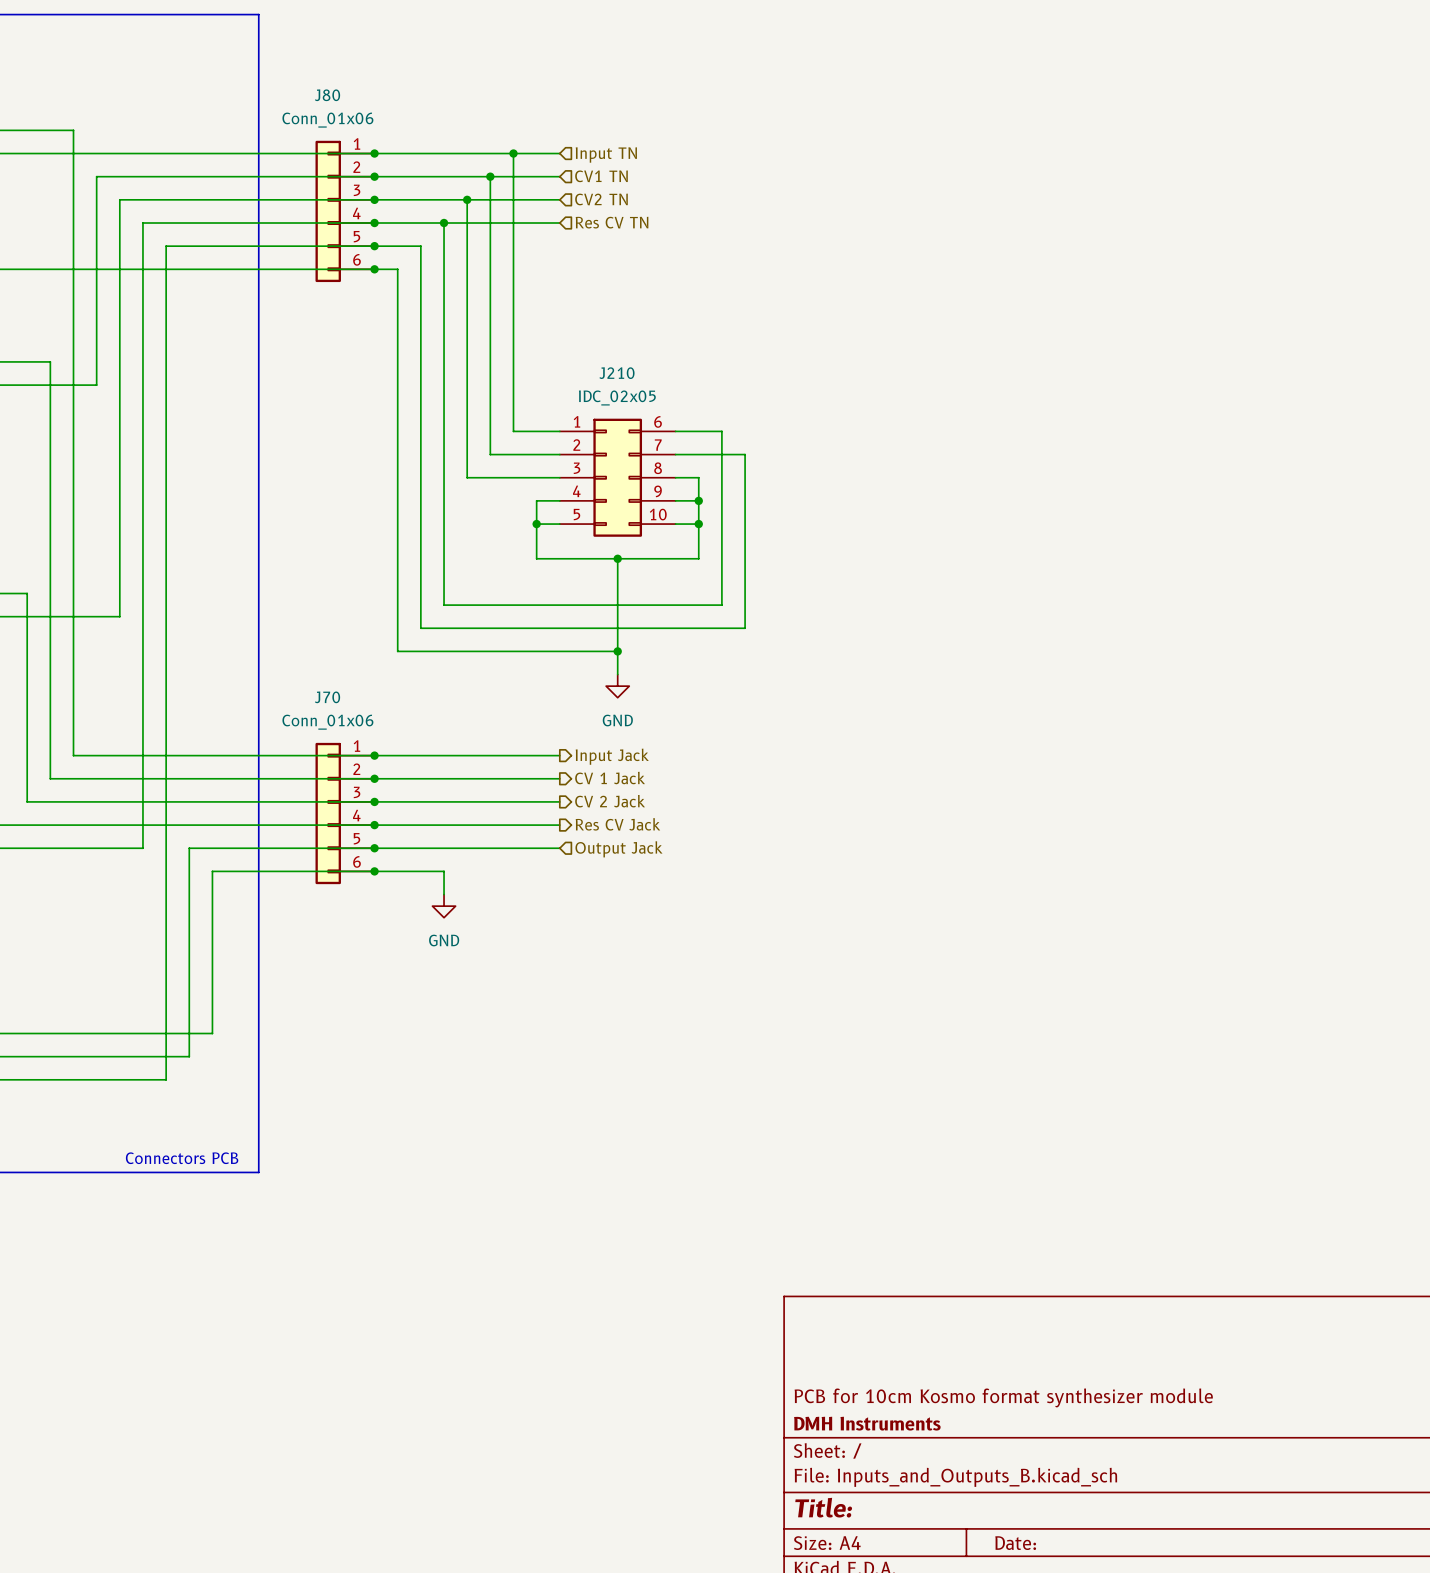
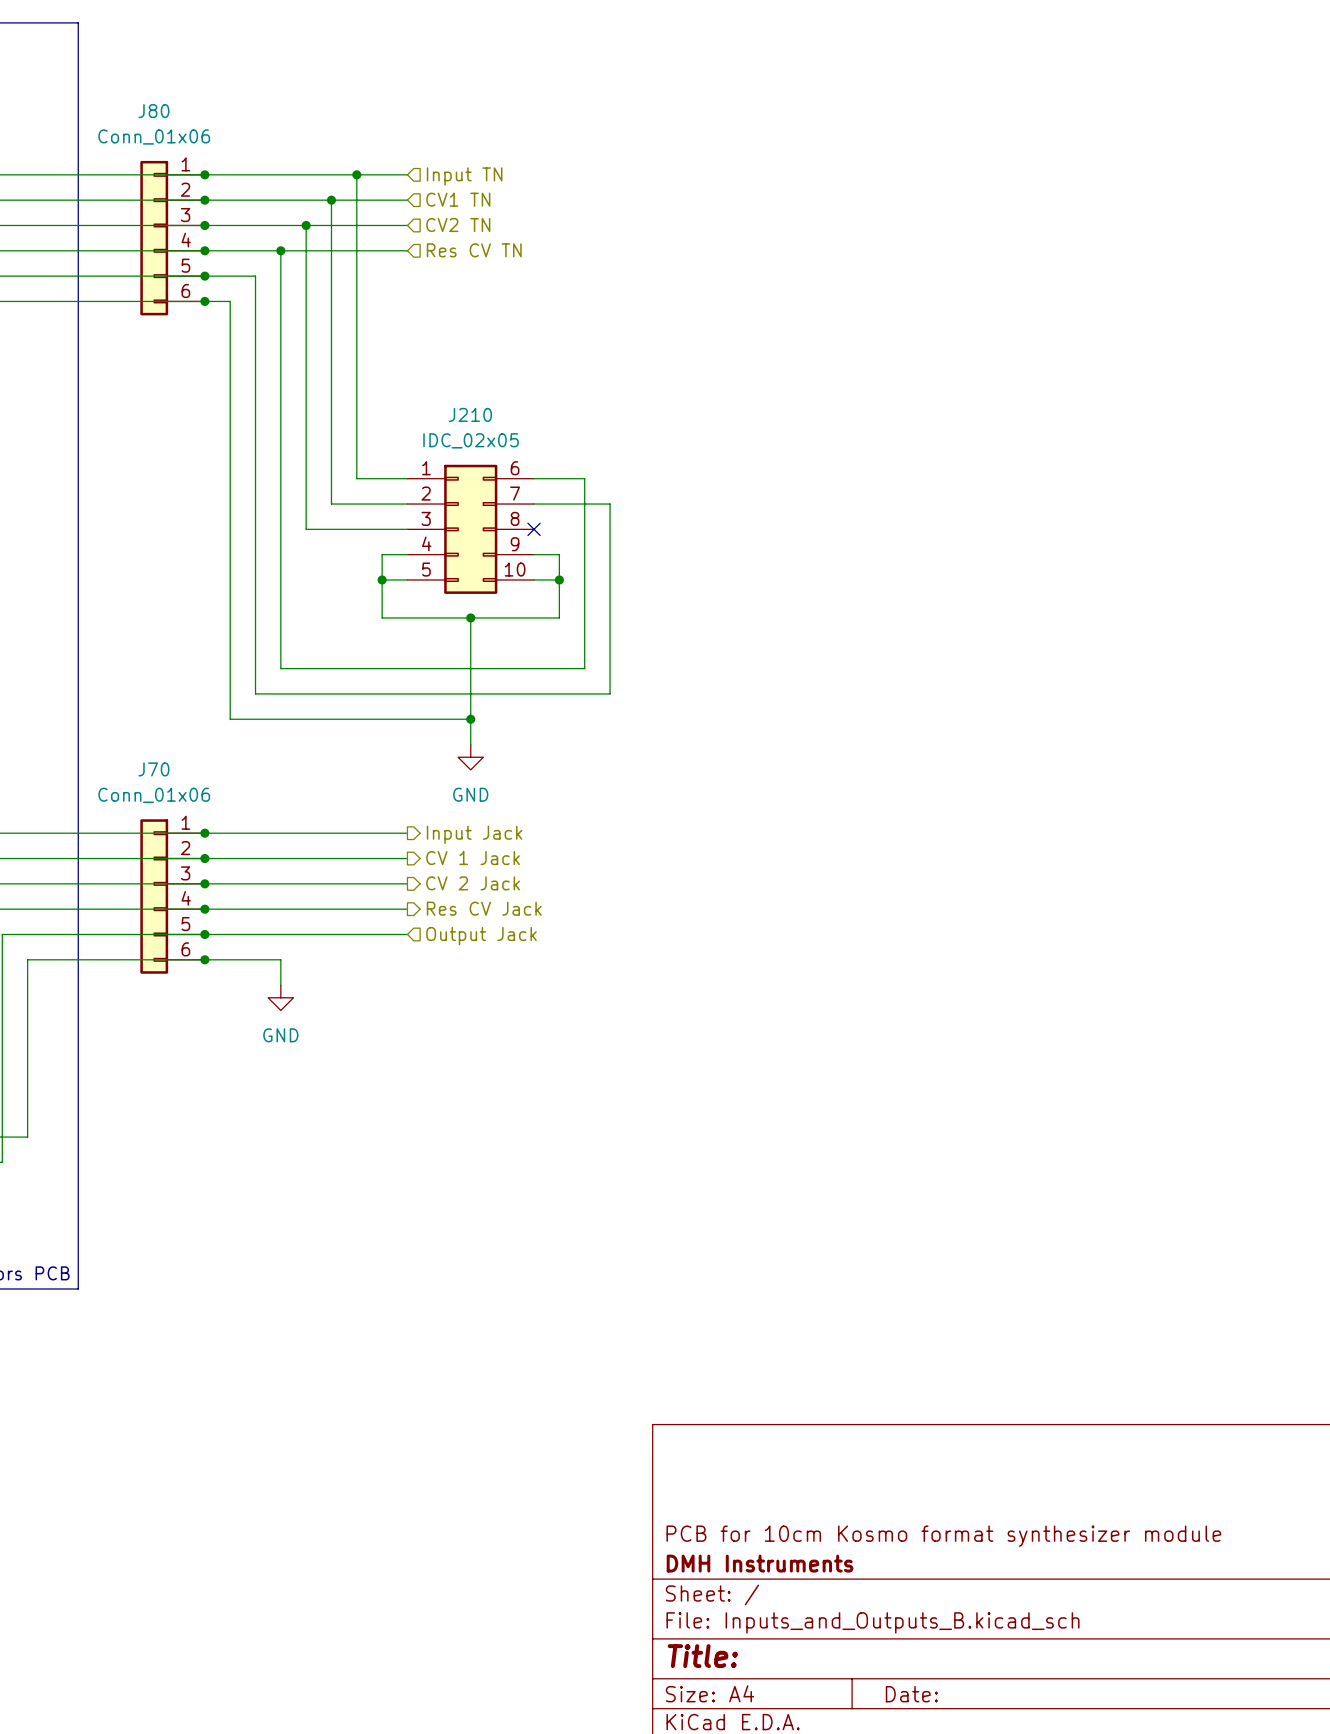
wire: (675, 477) (698, 477) (698, 500) -> none
no-connect mark: none -> (534, 529)
junction: (698, 500) -> none

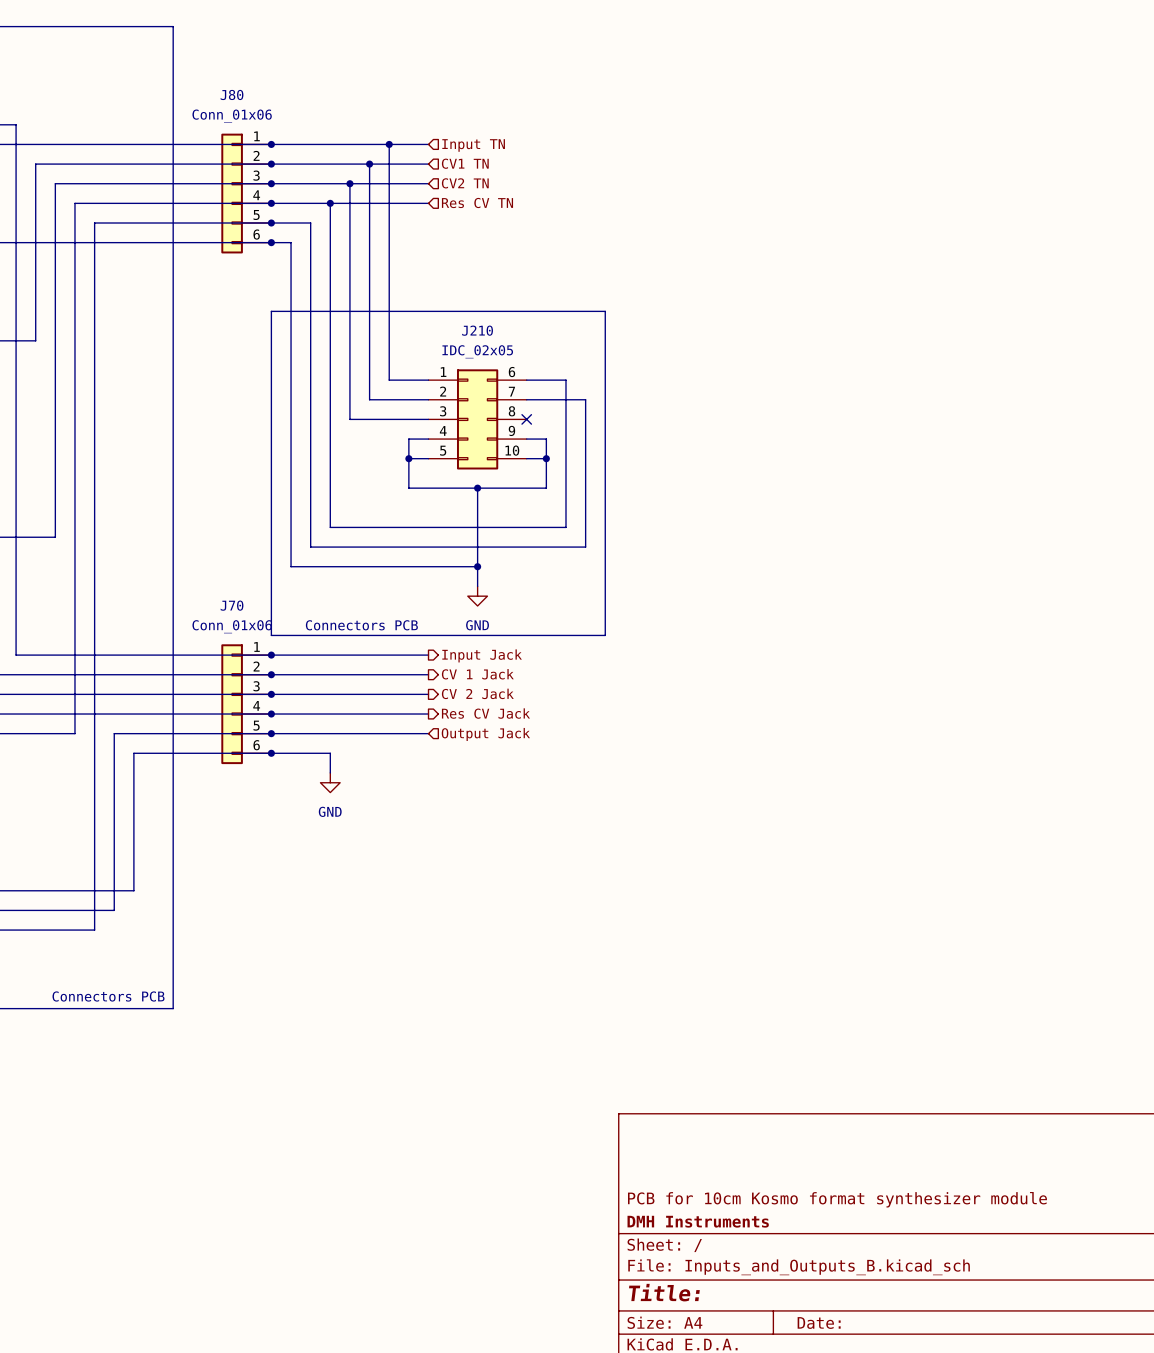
line: none -> (271, 311) (605, 311) (605, 635) (271, 635) (271, 311)
text: none -> Connectors PCB (361, 625)

